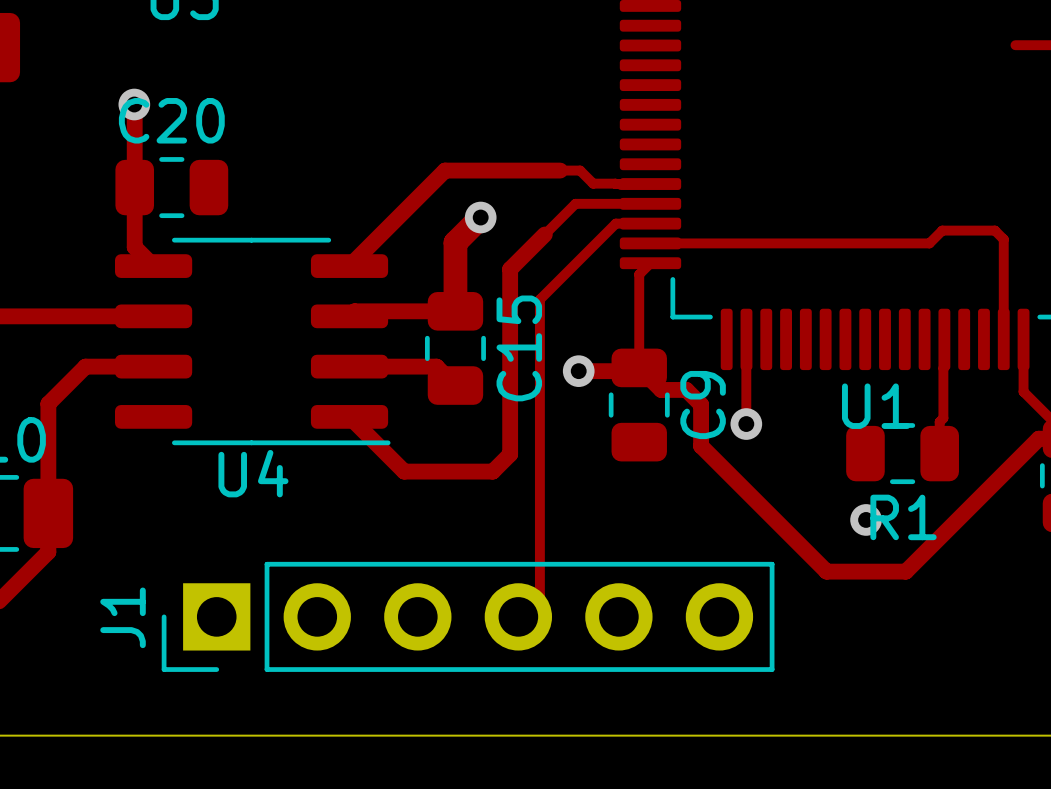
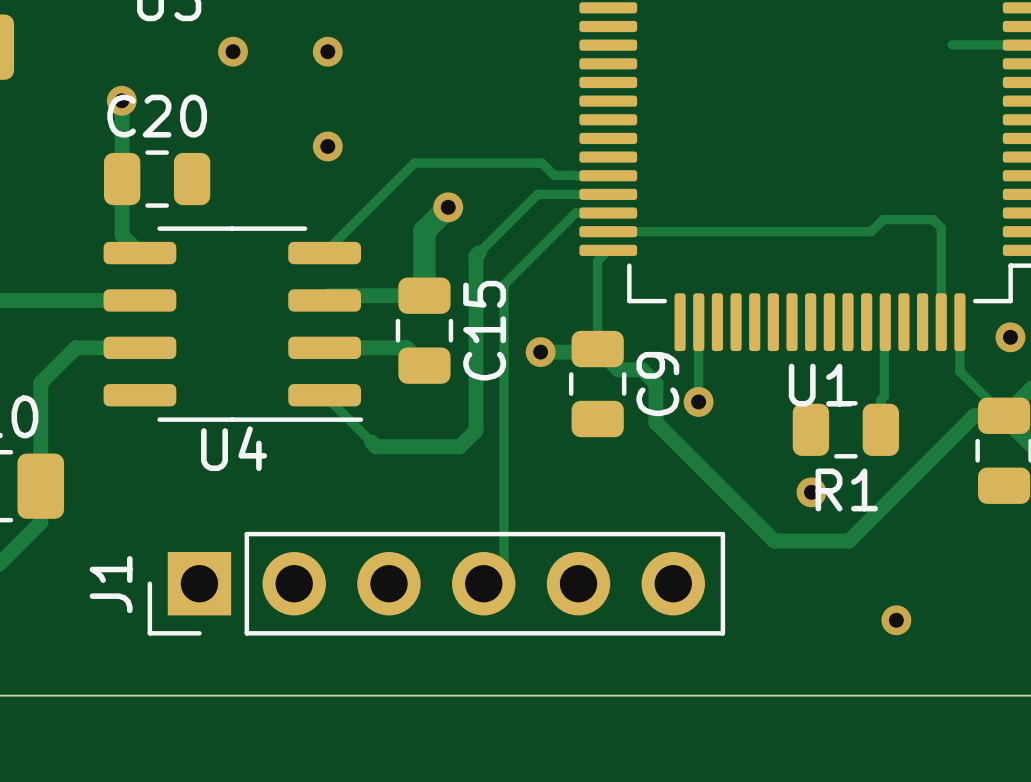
via: none -> (233, 51)
via: none -> (327, 51)
via: none -> (327, 146)
track width: thick (560, 170) (445, 170) (349, 266) -> thin (523, 163) (414, 163) (324, 253)
track width: thick (544, 234) (513, 265) -> thin (508, 223) (479, 252)
track width: thick (349, 416) (399, 466) -> thin (324, 395) (371, 442)
via: none -> (896, 620)

